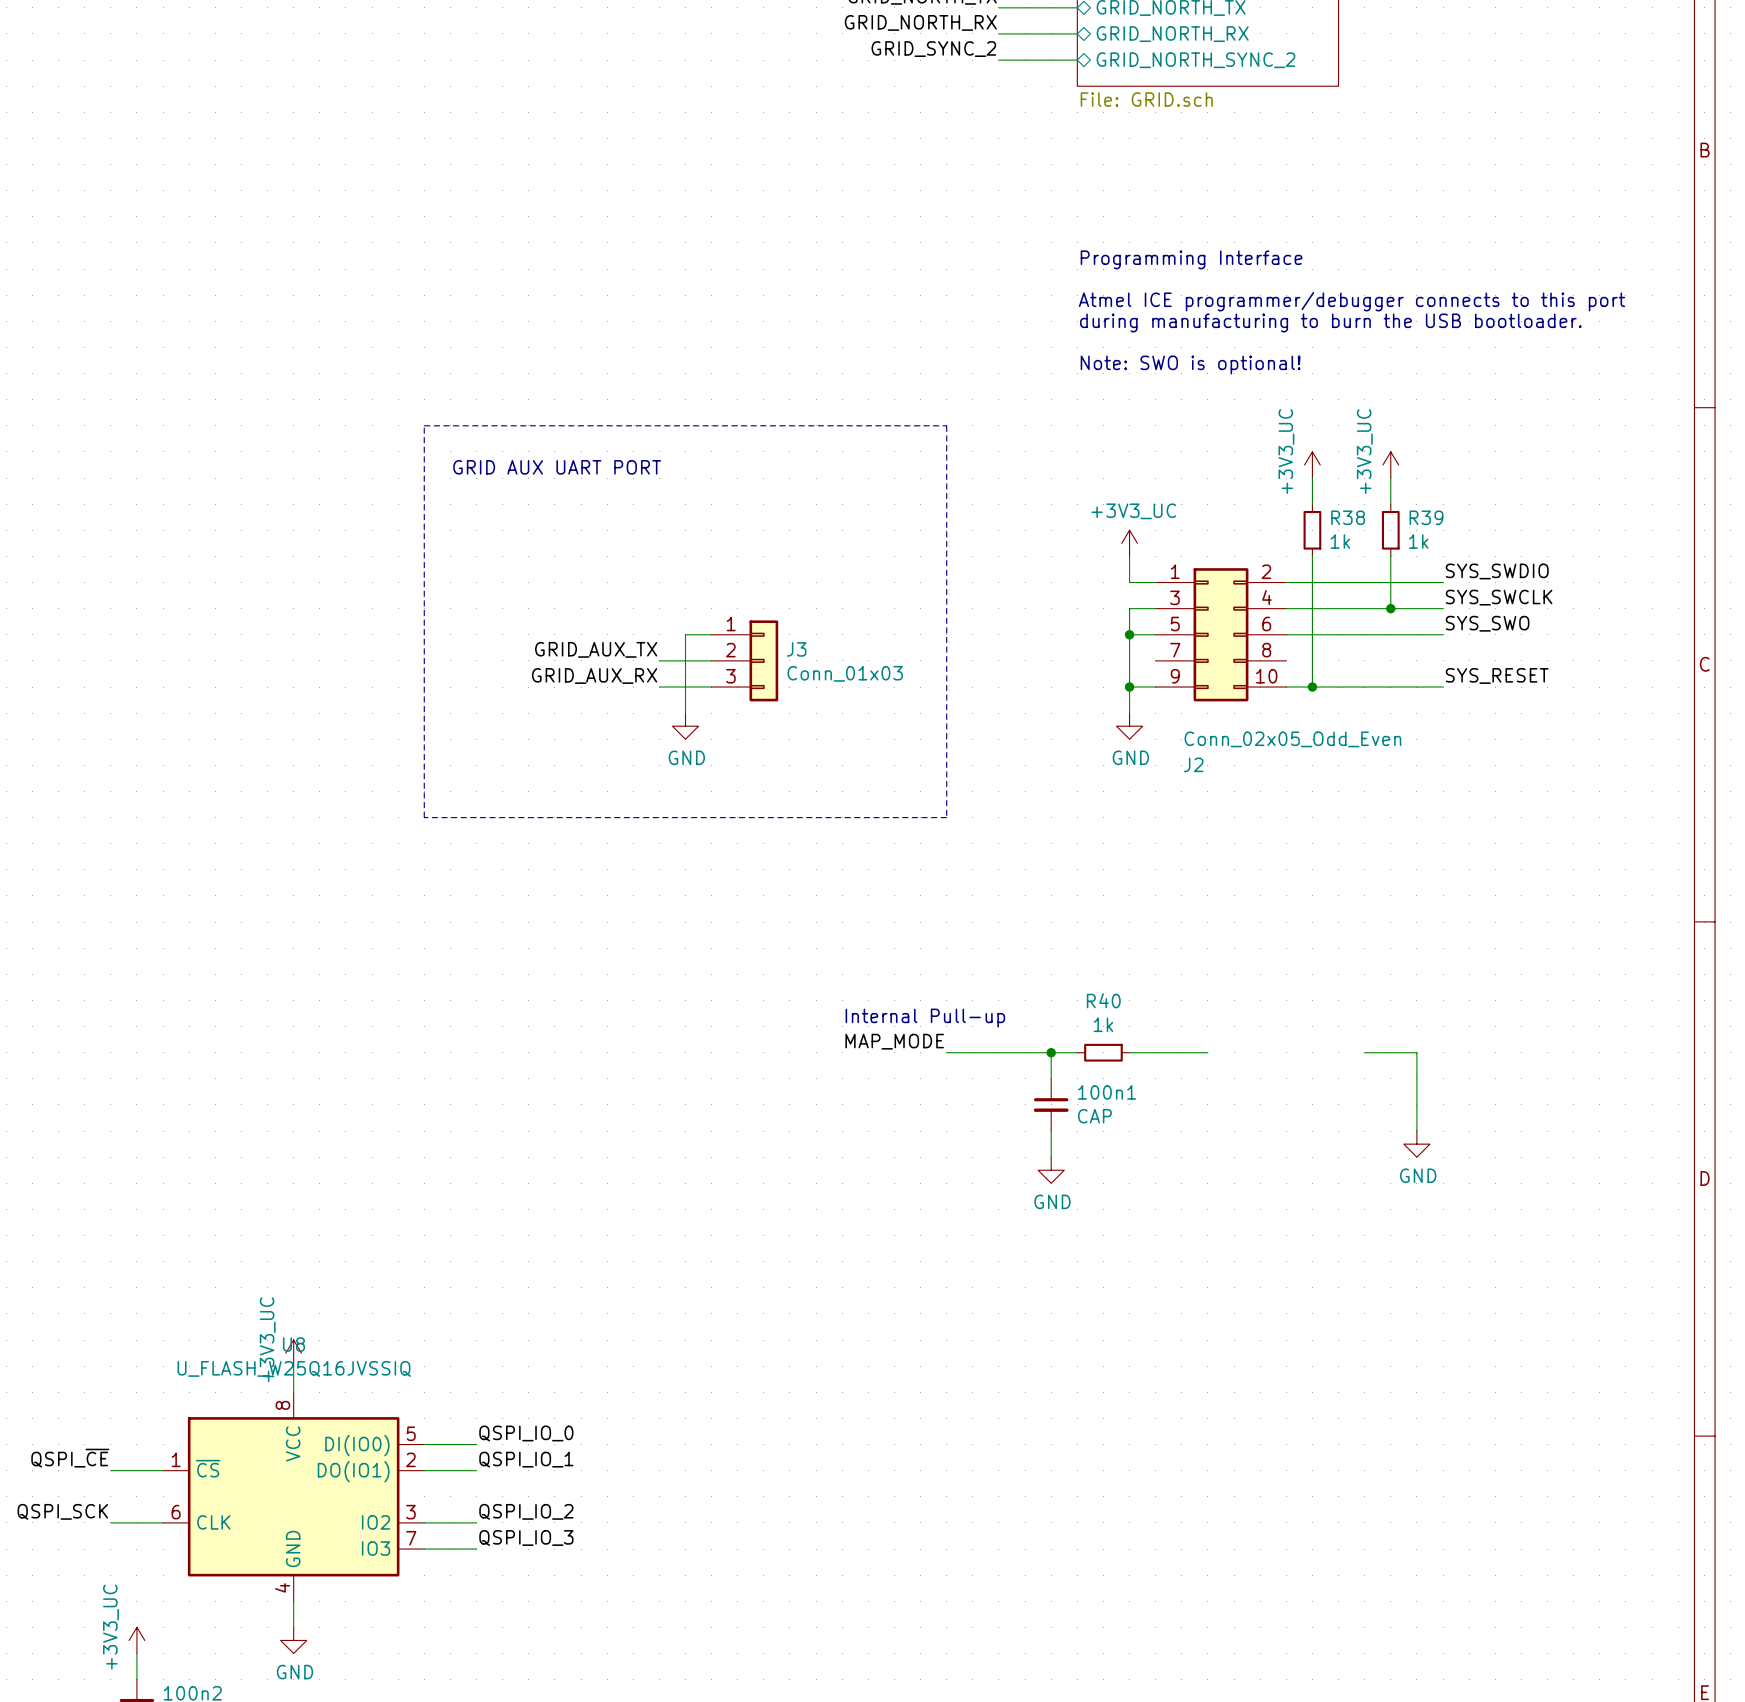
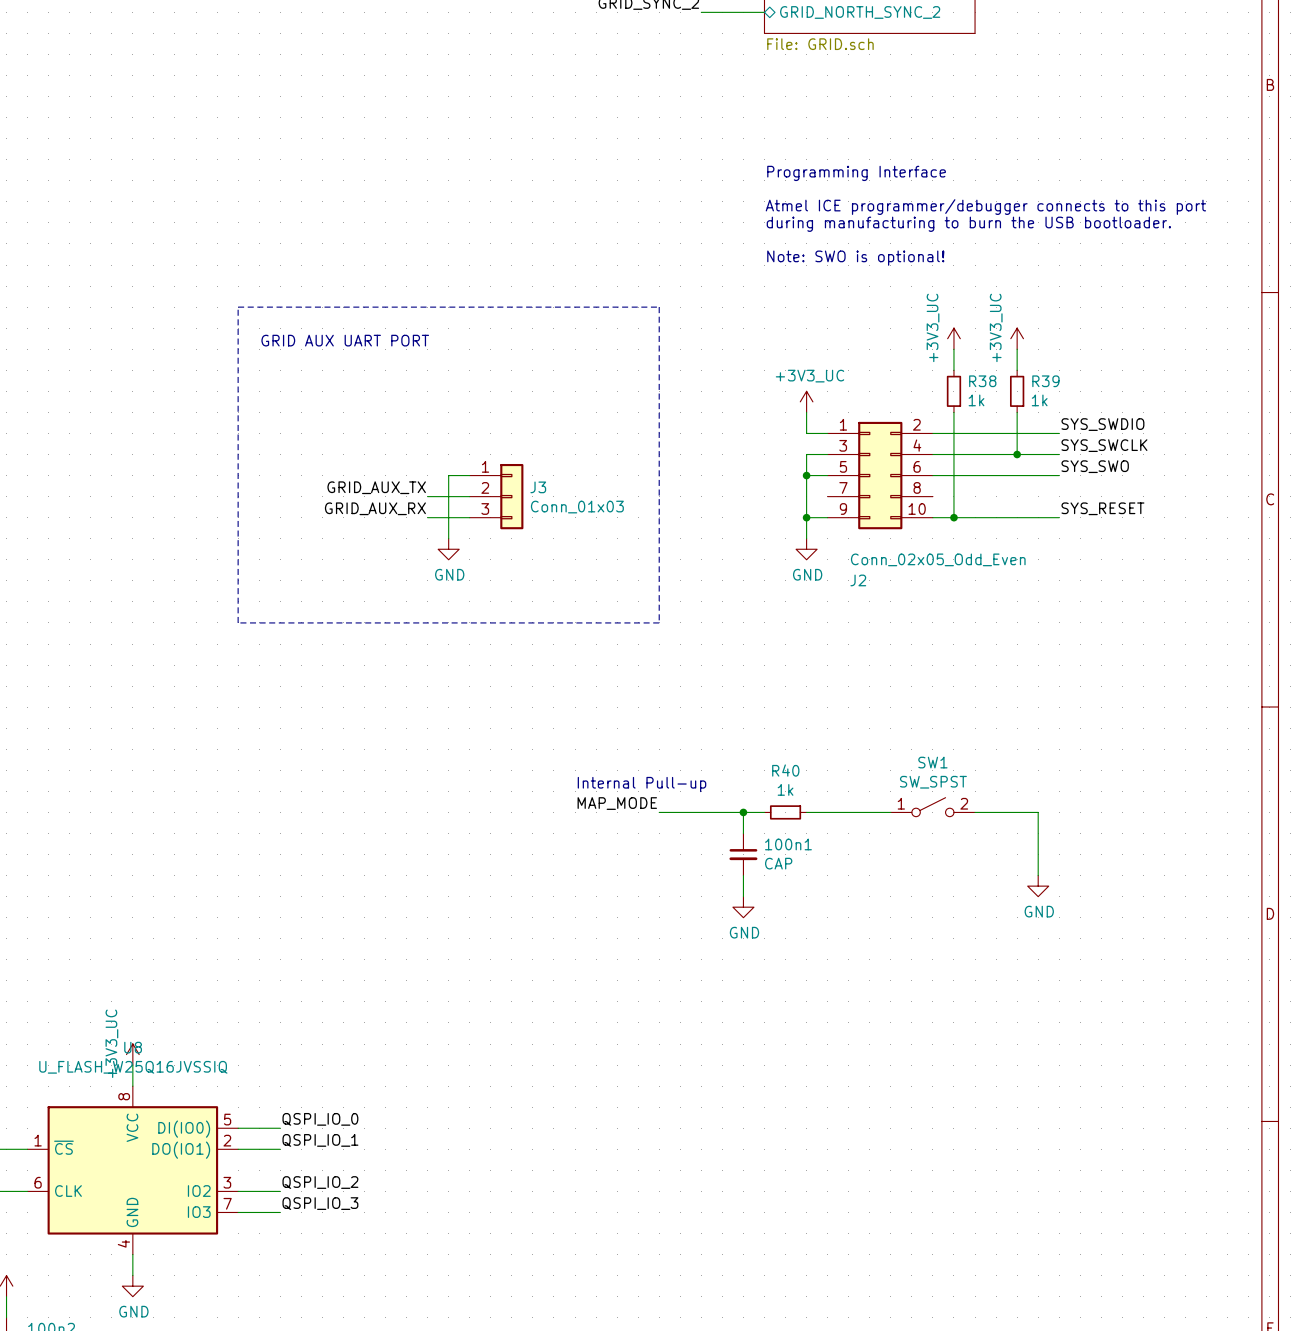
SW1: none -> SW_SPST (932, 807)
wire: none -> (869, 812) (890, 812)
wire: none -> (975, 812) (996, 812)

